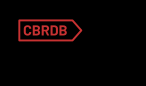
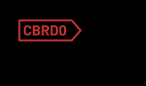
global label: CBRDB (45, 30) -> CBRD0 (44, 30)

